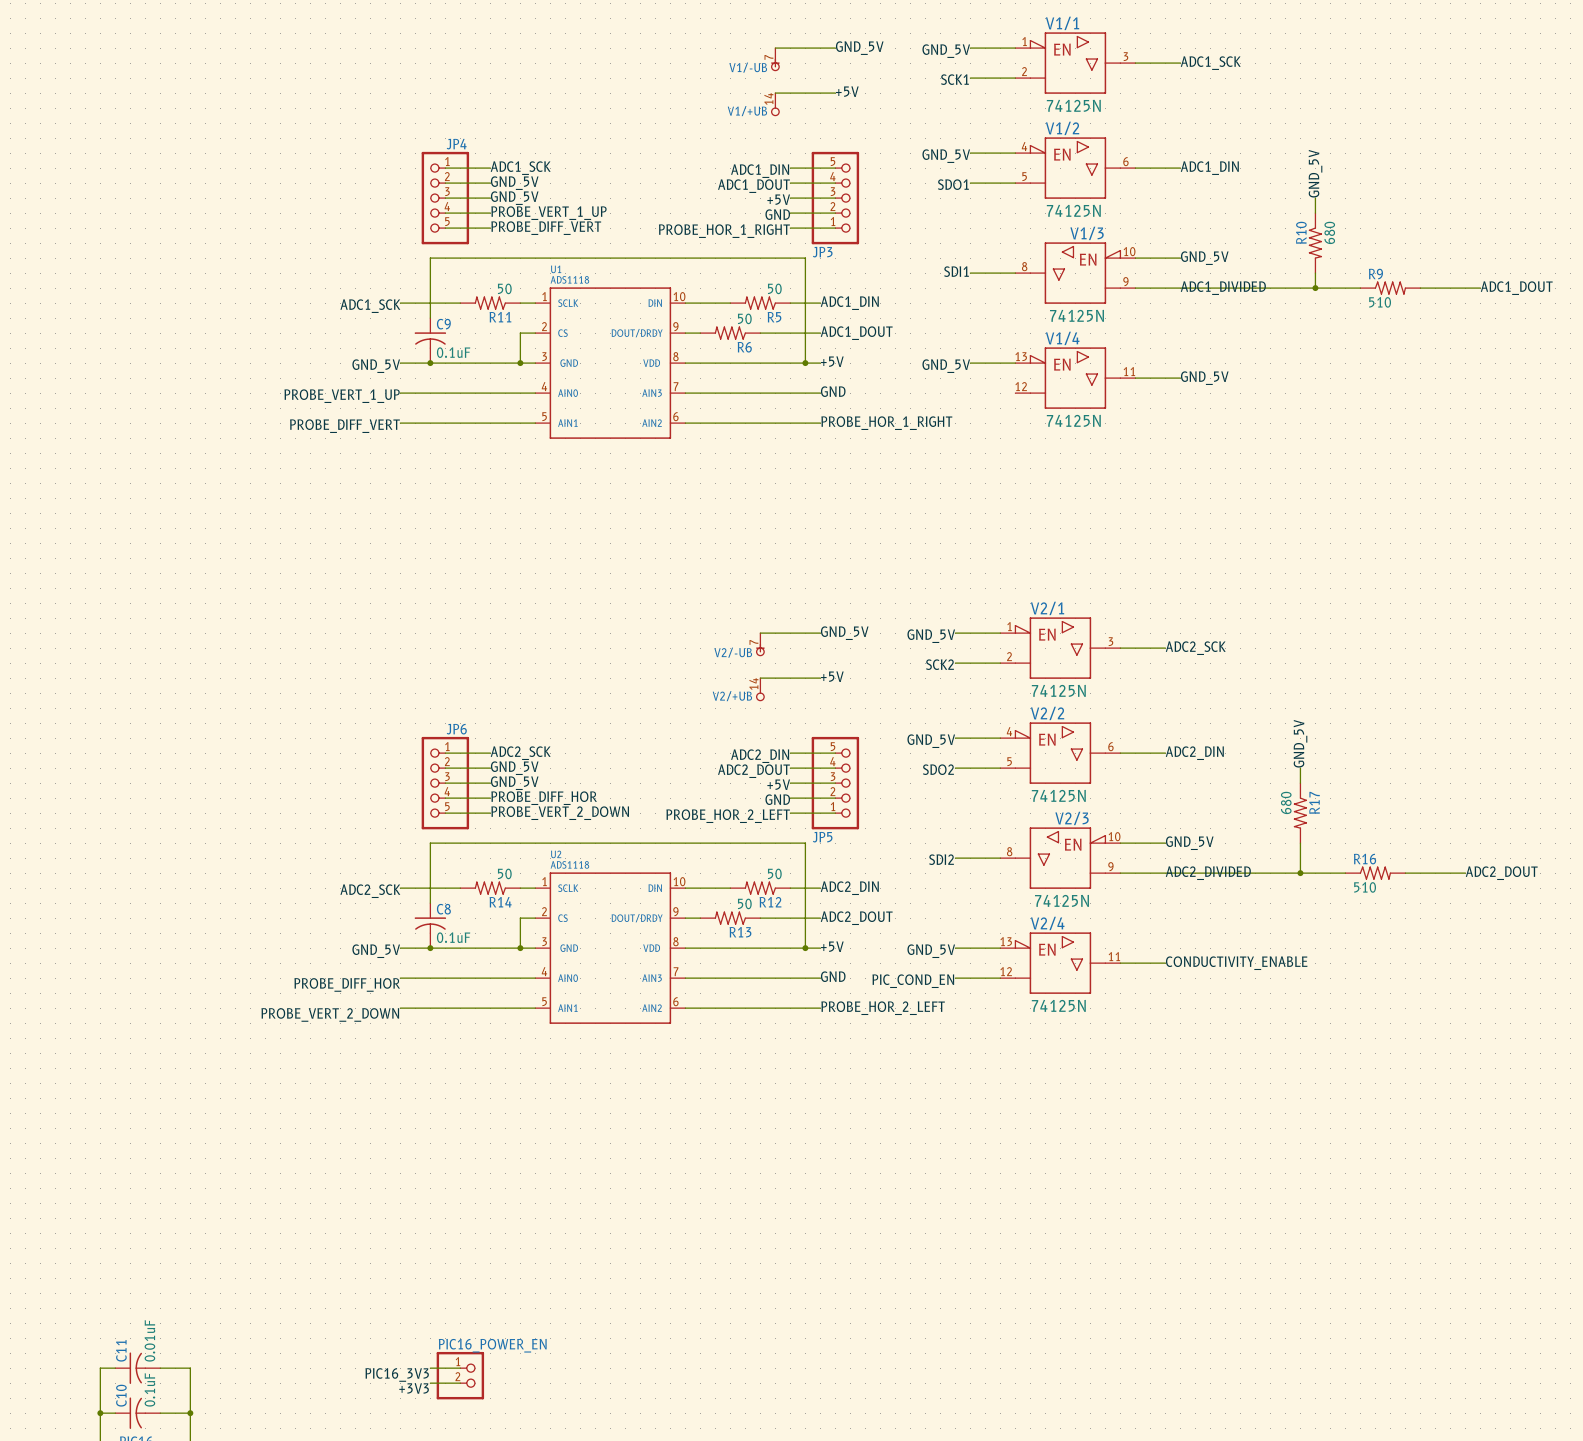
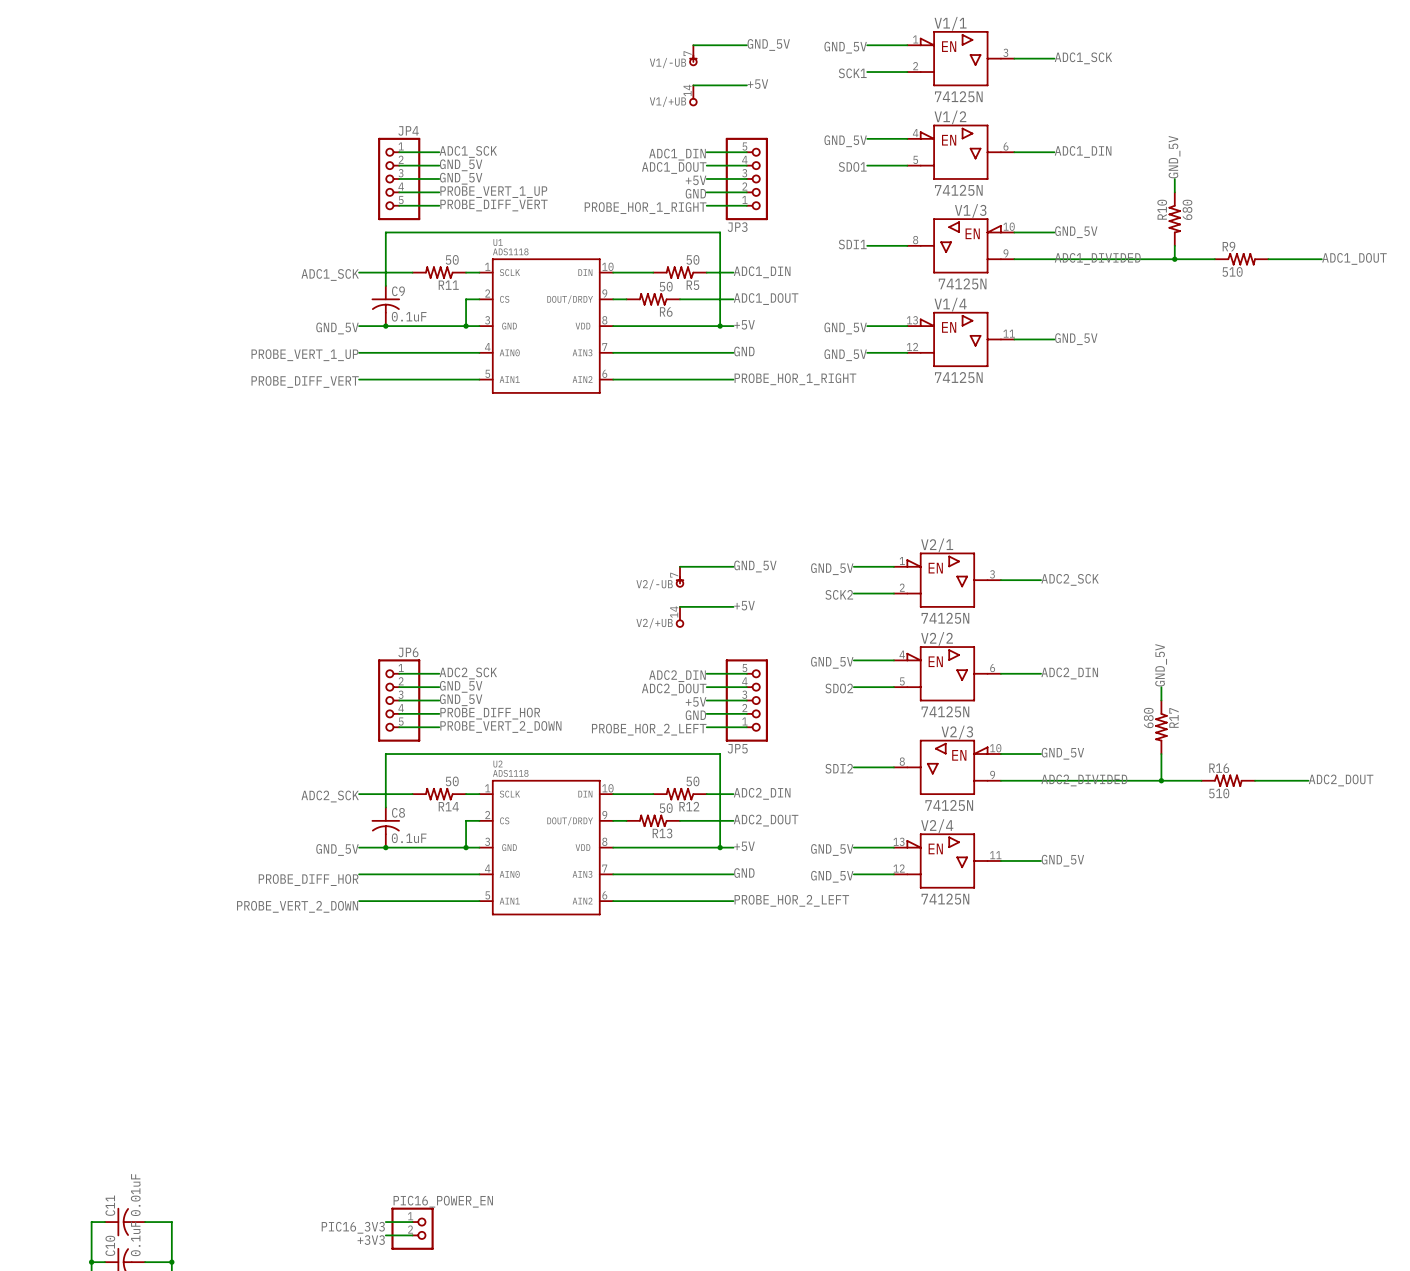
wire: none -> (867, 352) (907, 352)
label: none -> GND_5V (845, 355)
label: CONDUCTIVITY_ENABLE (1236, 963) -> GND_5V (1062, 860)
label: PIC_COND_EN (913, 981) -> GND_5V (832, 876)

